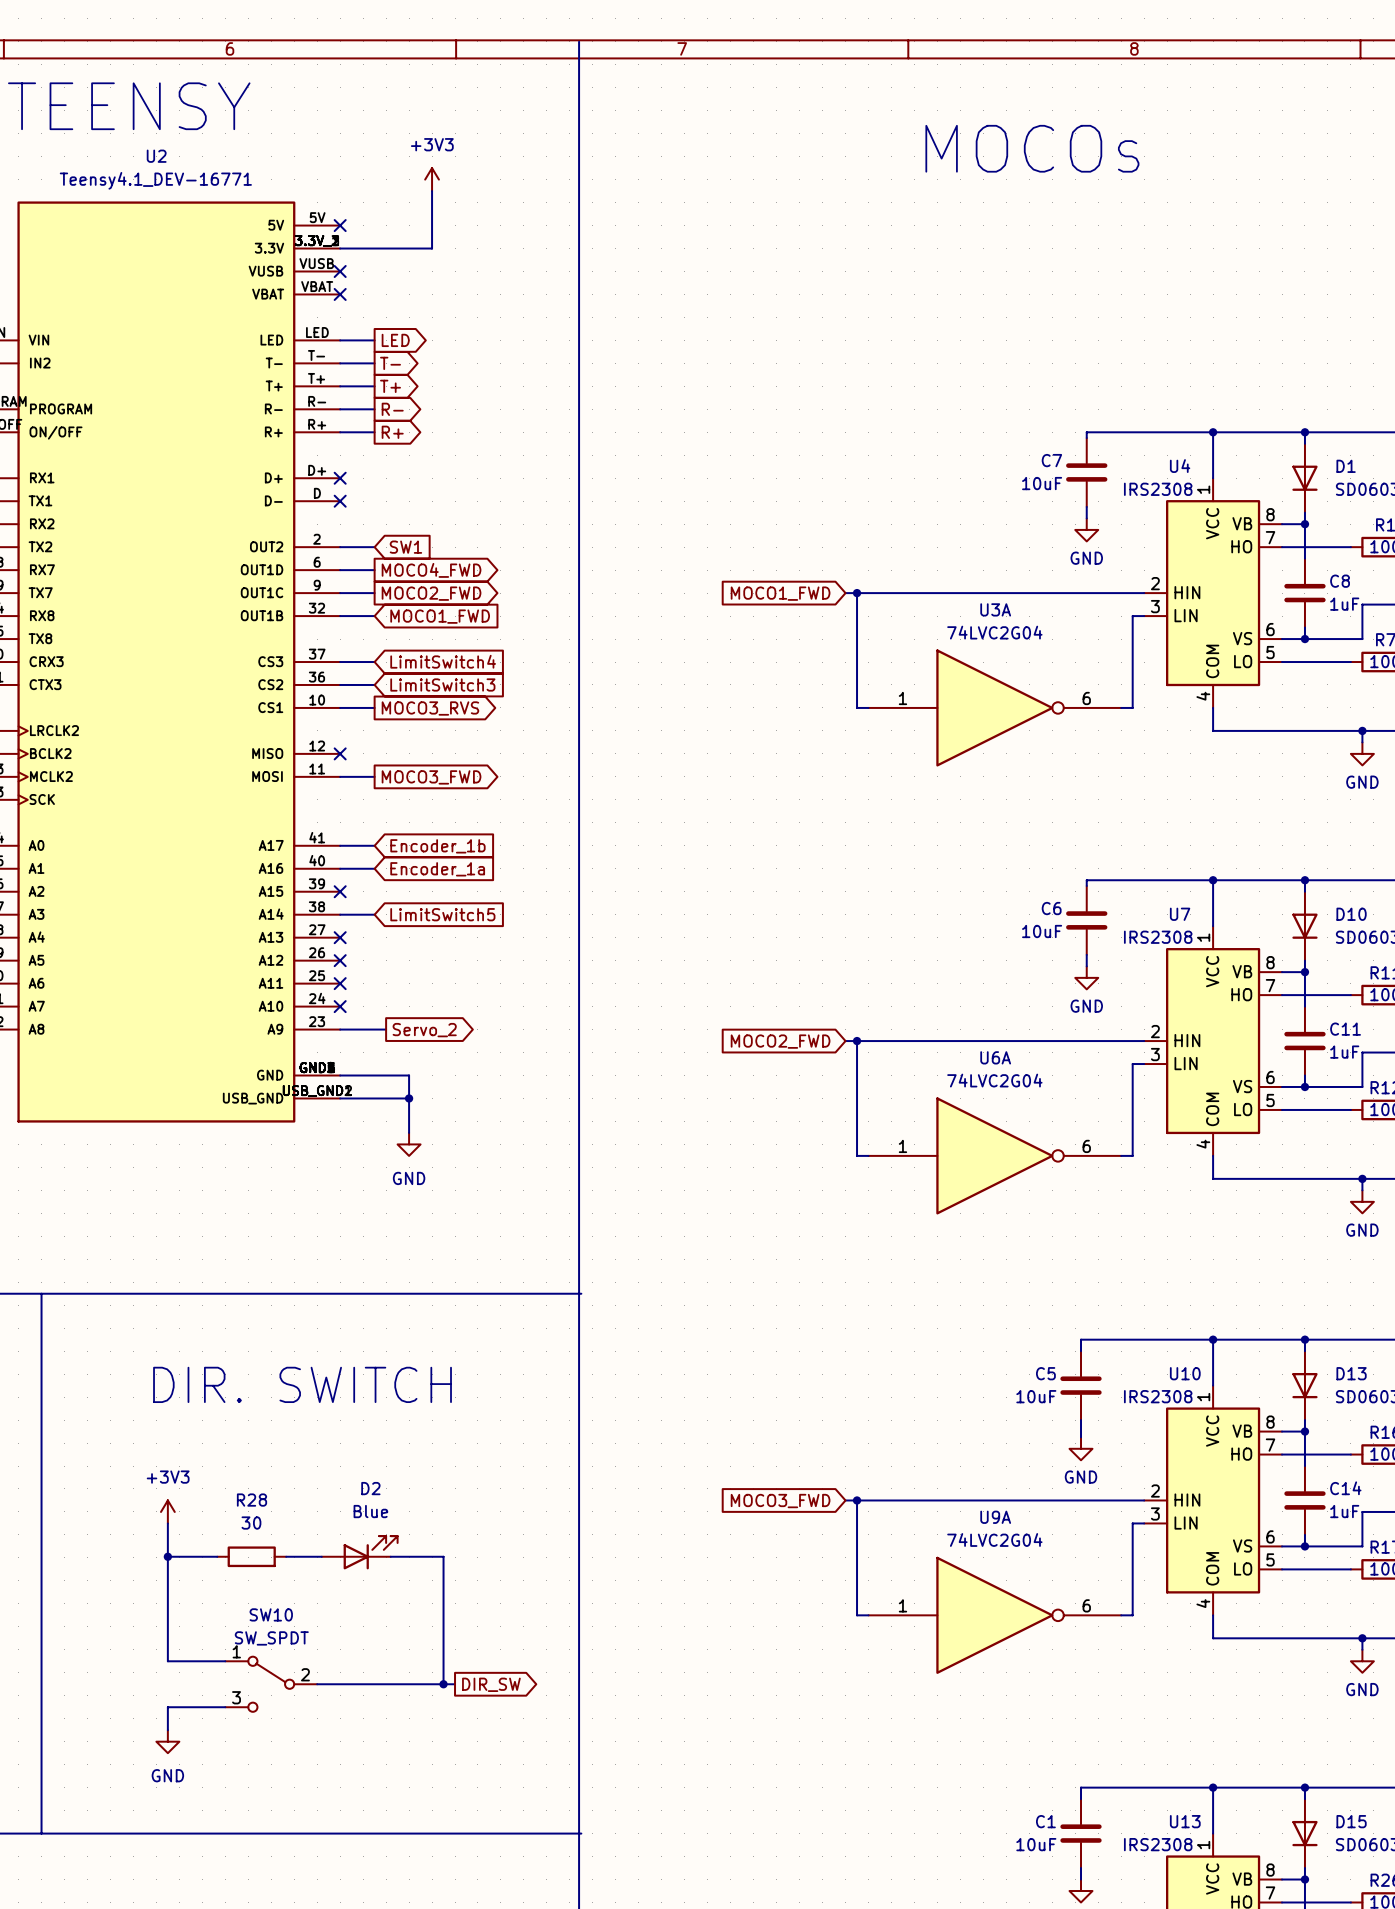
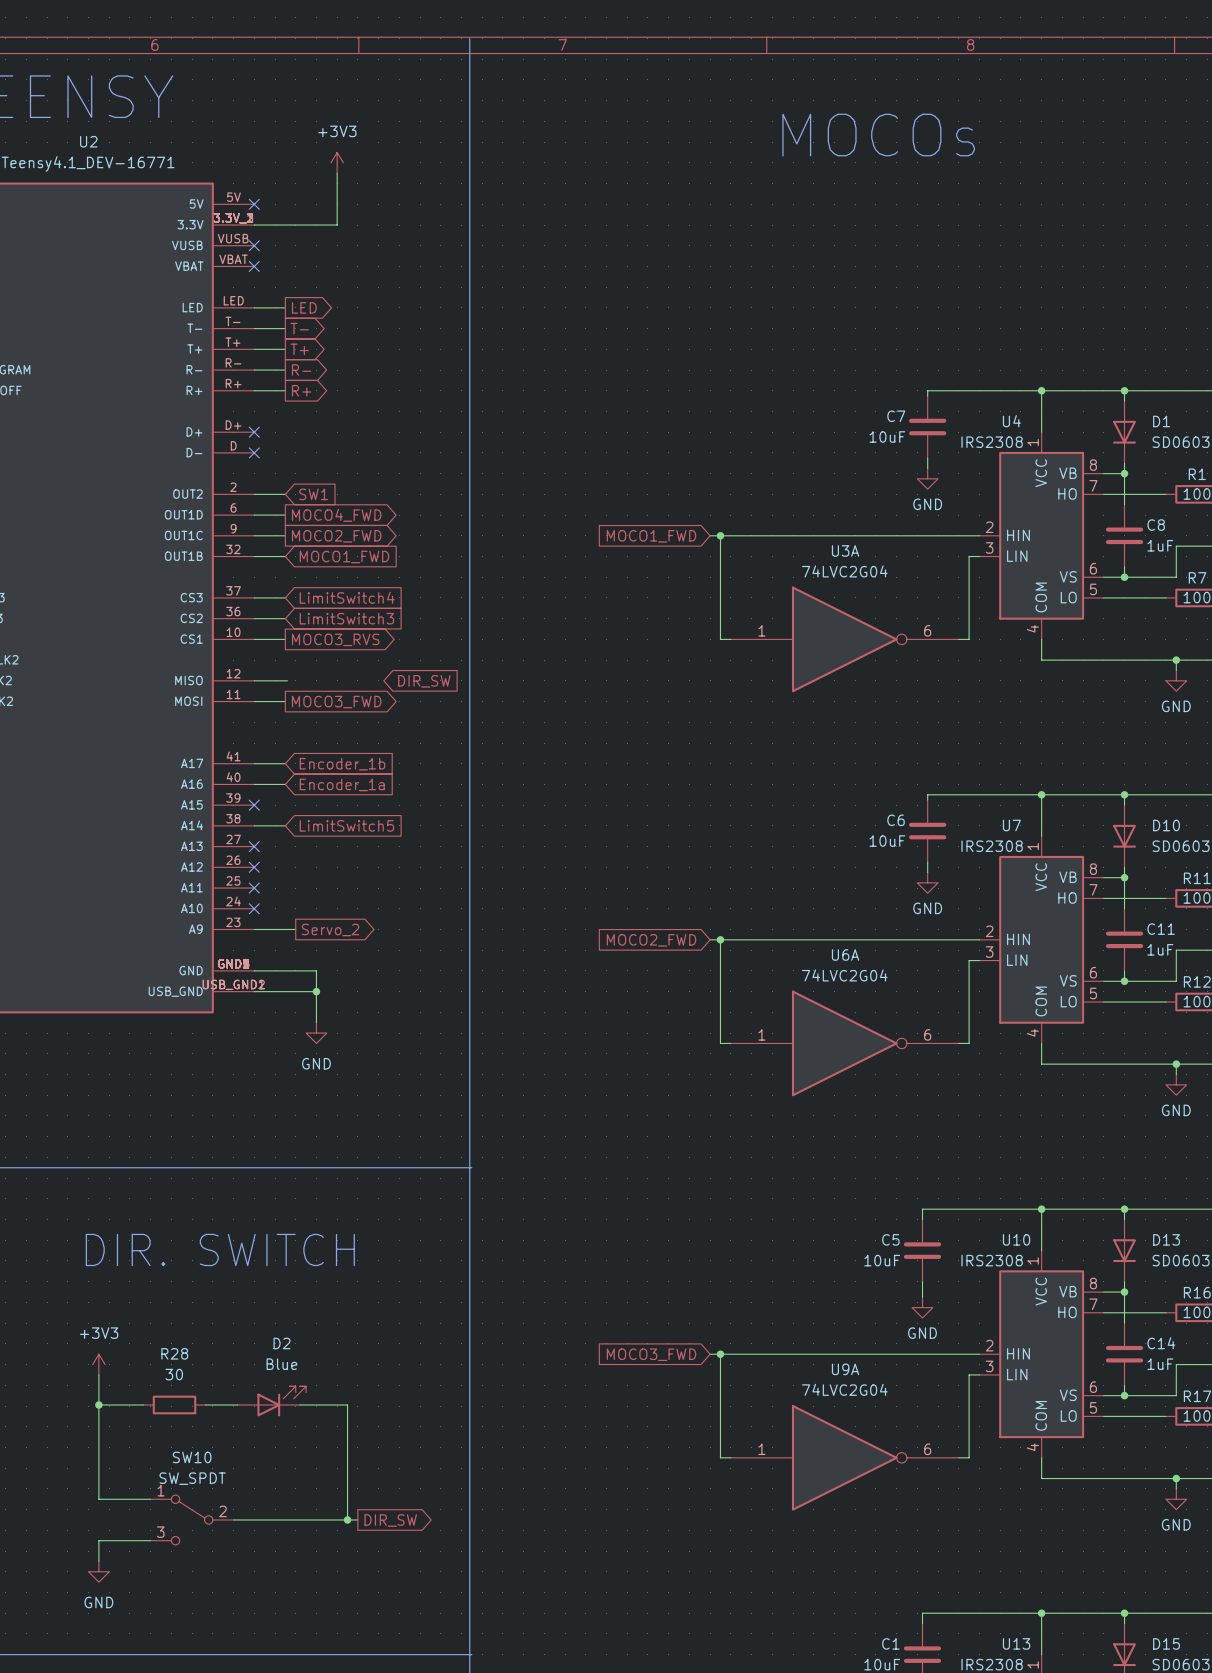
wire: none -> (254, 680) (287, 680)
no-connect mark: (340, 753) -> none
global label: none -> DIR_SW (424, 681)

